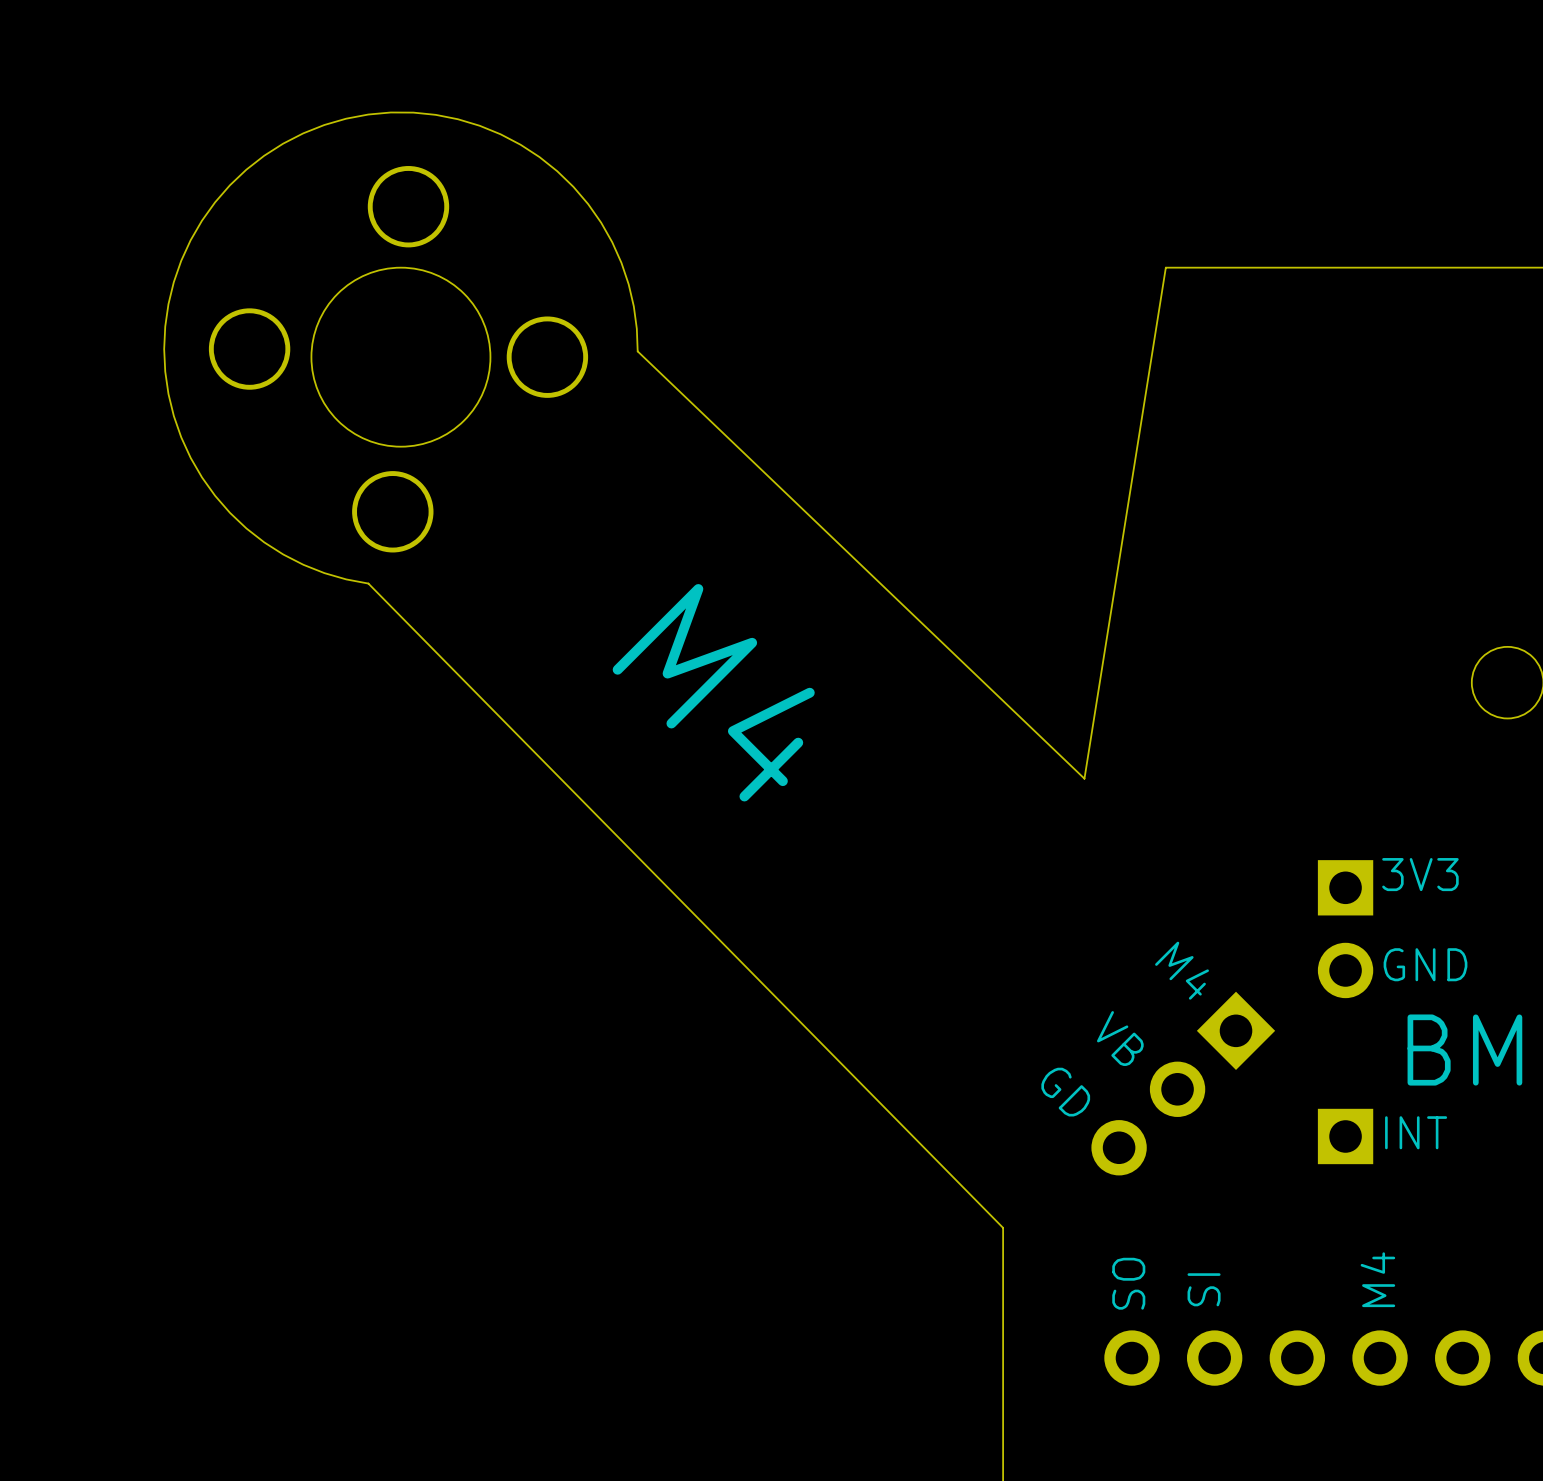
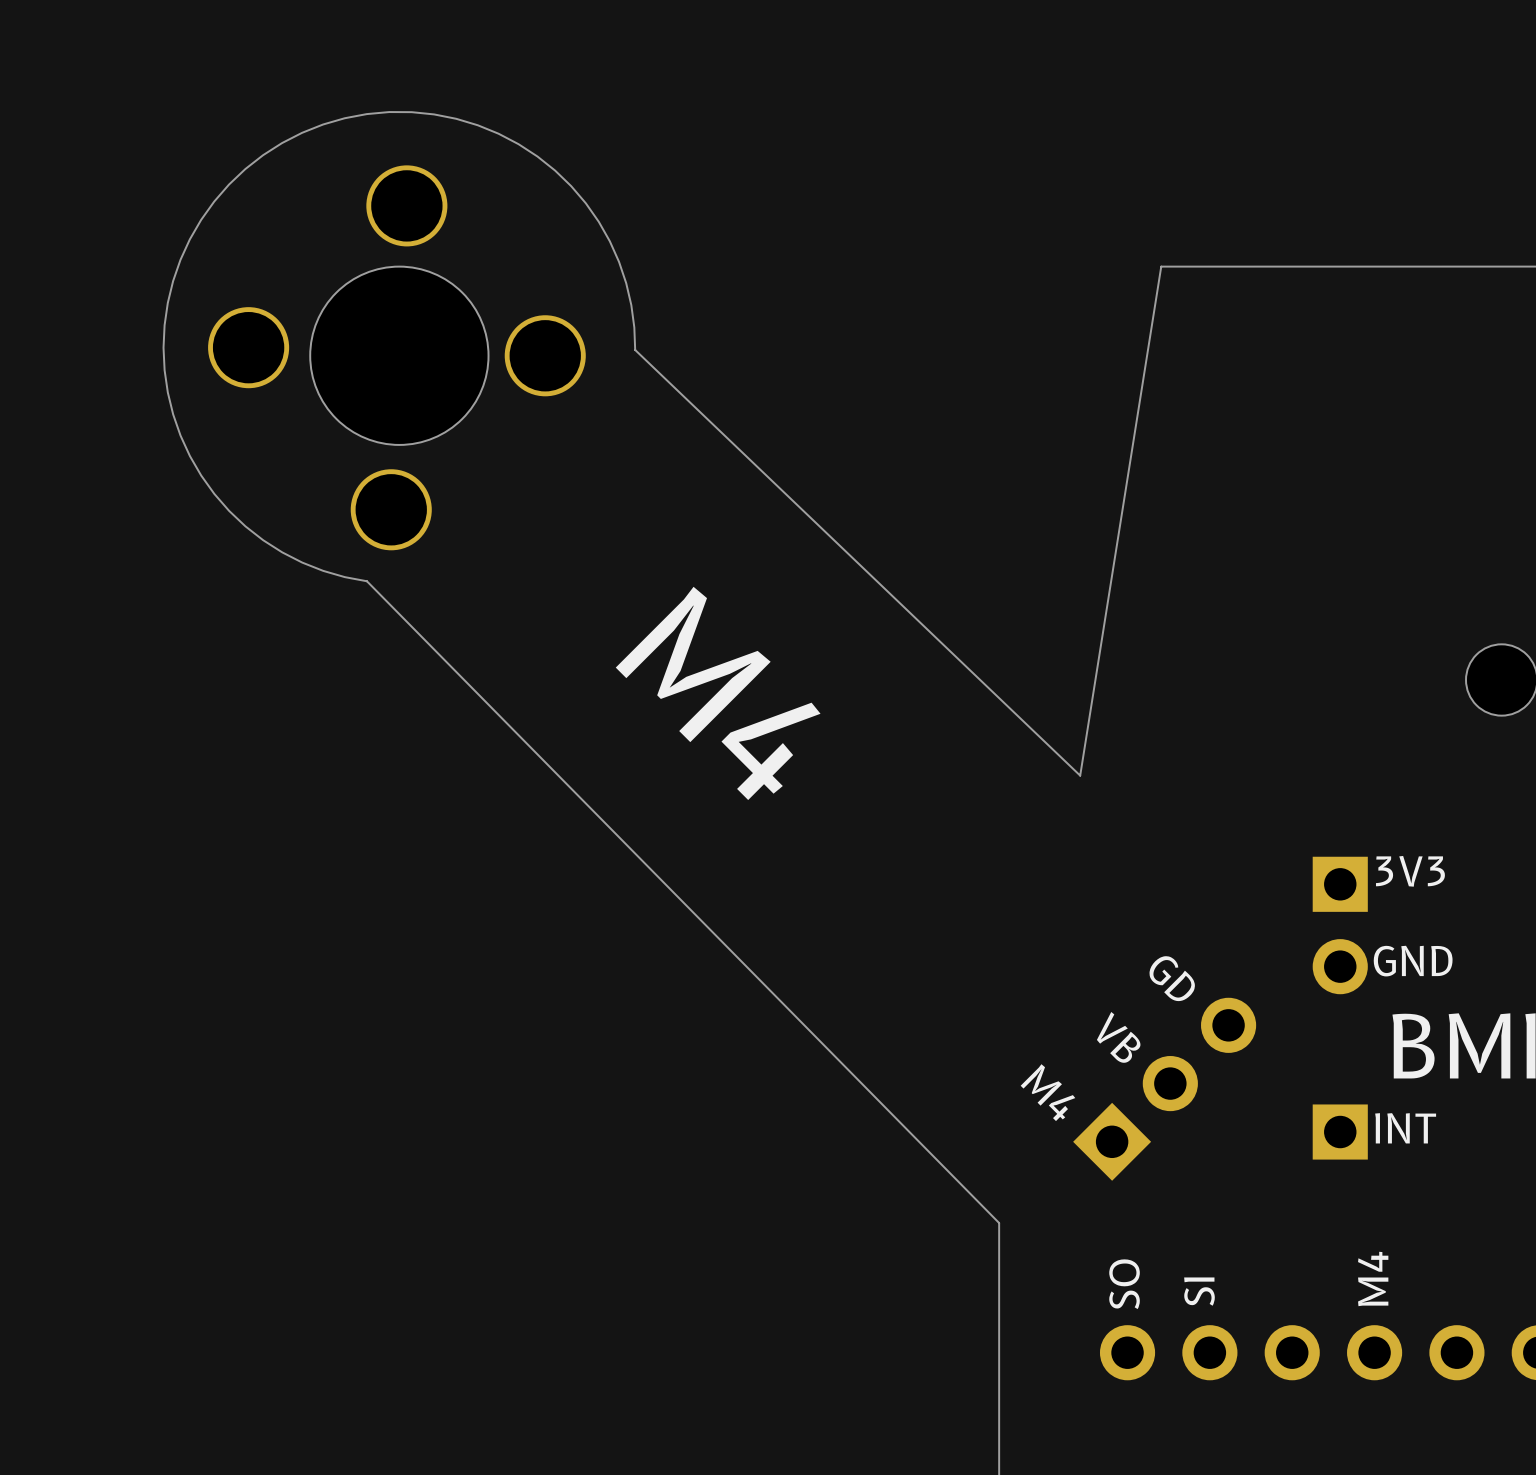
text: M4 (1182, 970) -> GD (1172, 978)
part rotation: 0° (1183, 1083) -> 180° (1164, 1089)
text: GD (1065, 1092) -> M4 (1047, 1092)

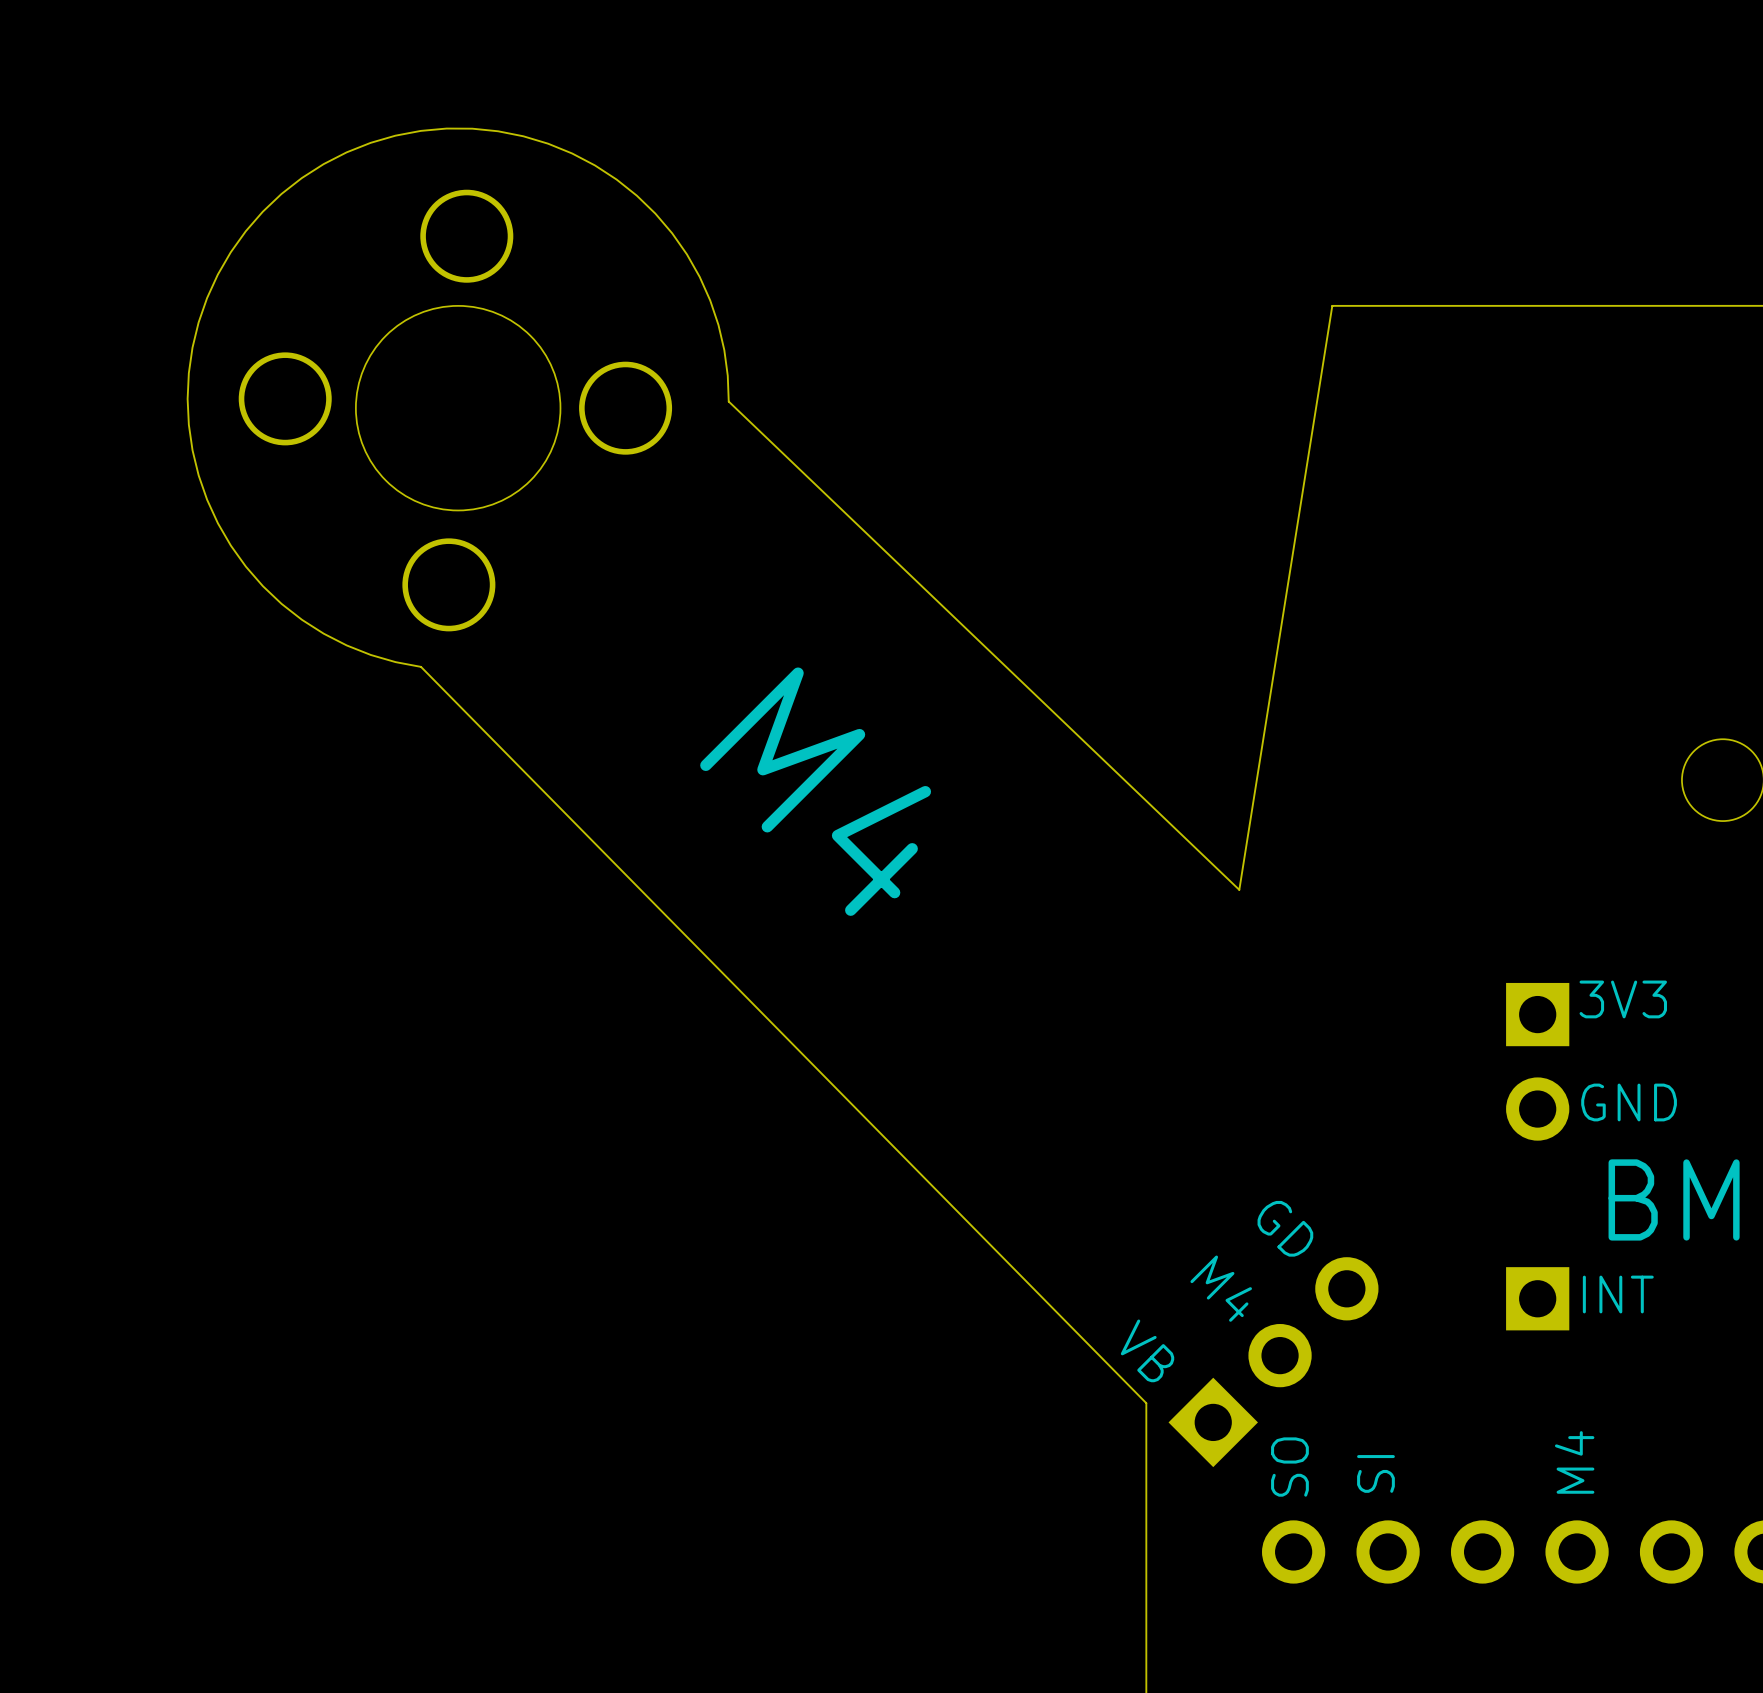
text position: GD (1172, 978) -> GD (1285, 1228)
text position: VB (1118, 1037) -> VB (1147, 1350)
part position: (1164, 1089) -> (1273, 1362)
text position: M4 (1047, 1092) -> M4 (1221, 1288)

